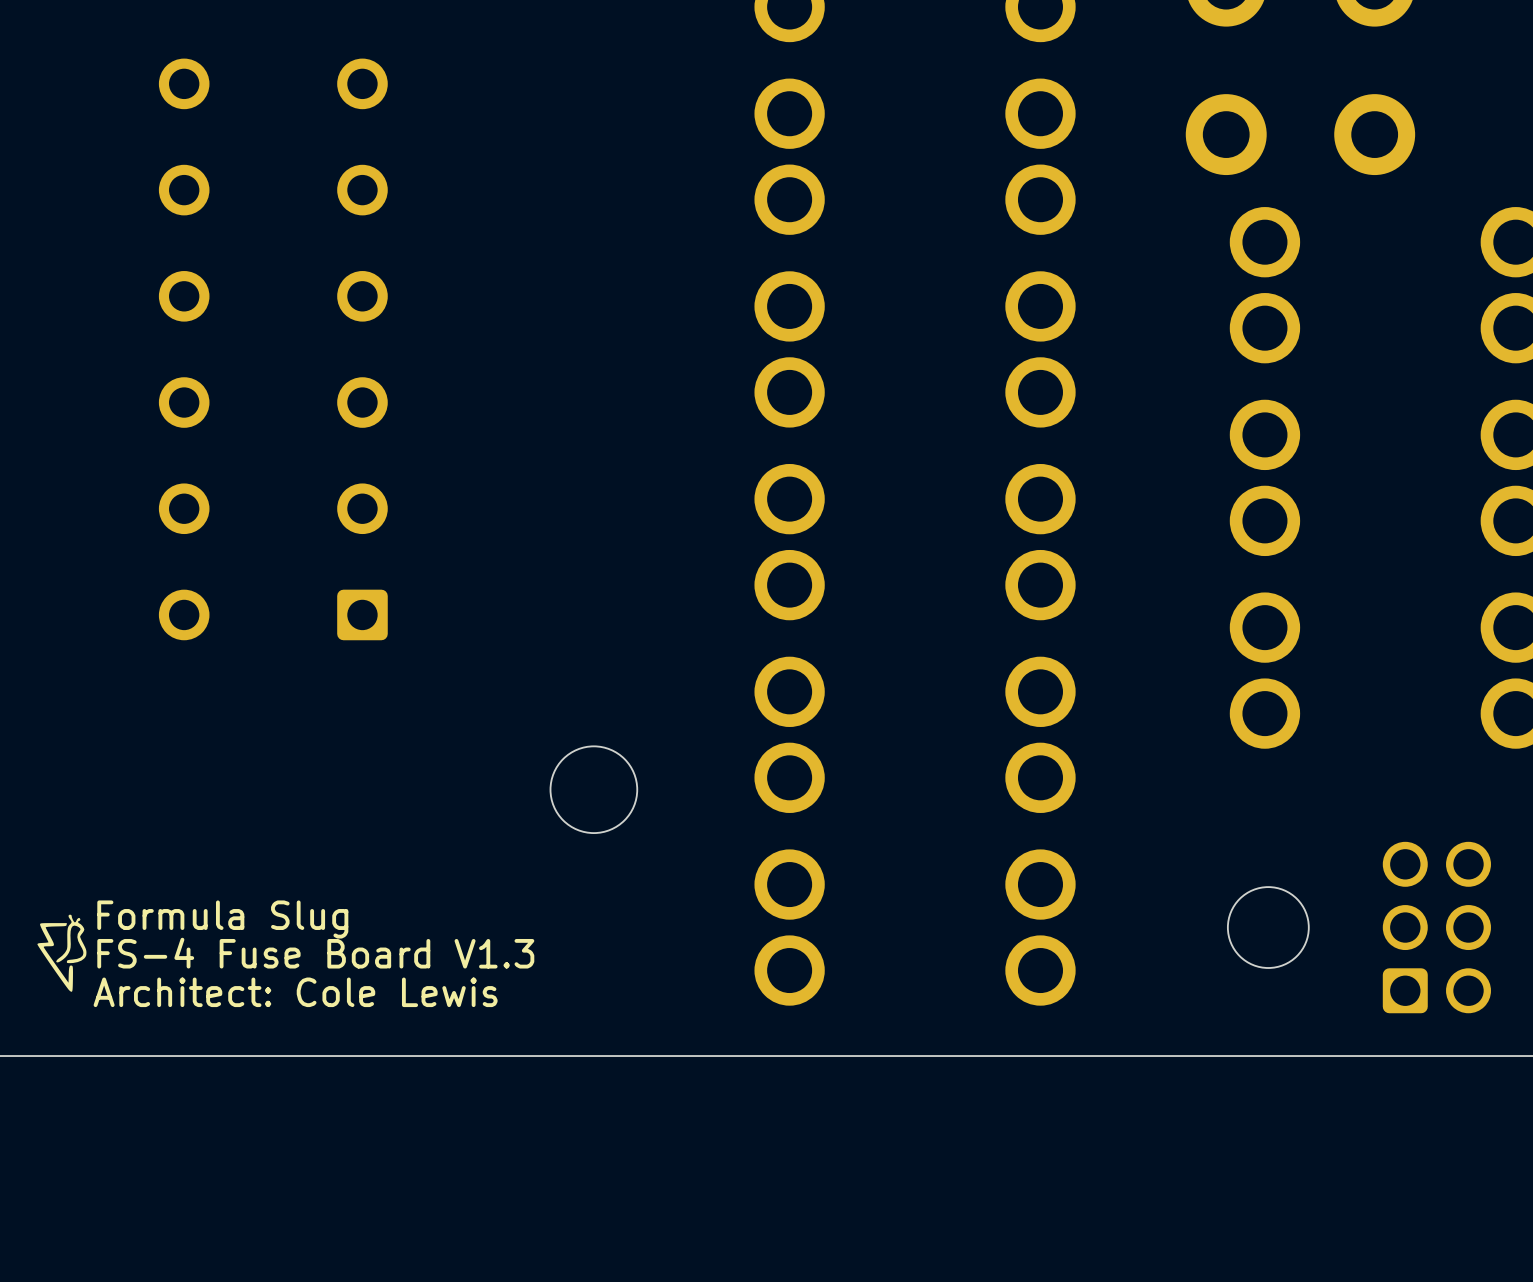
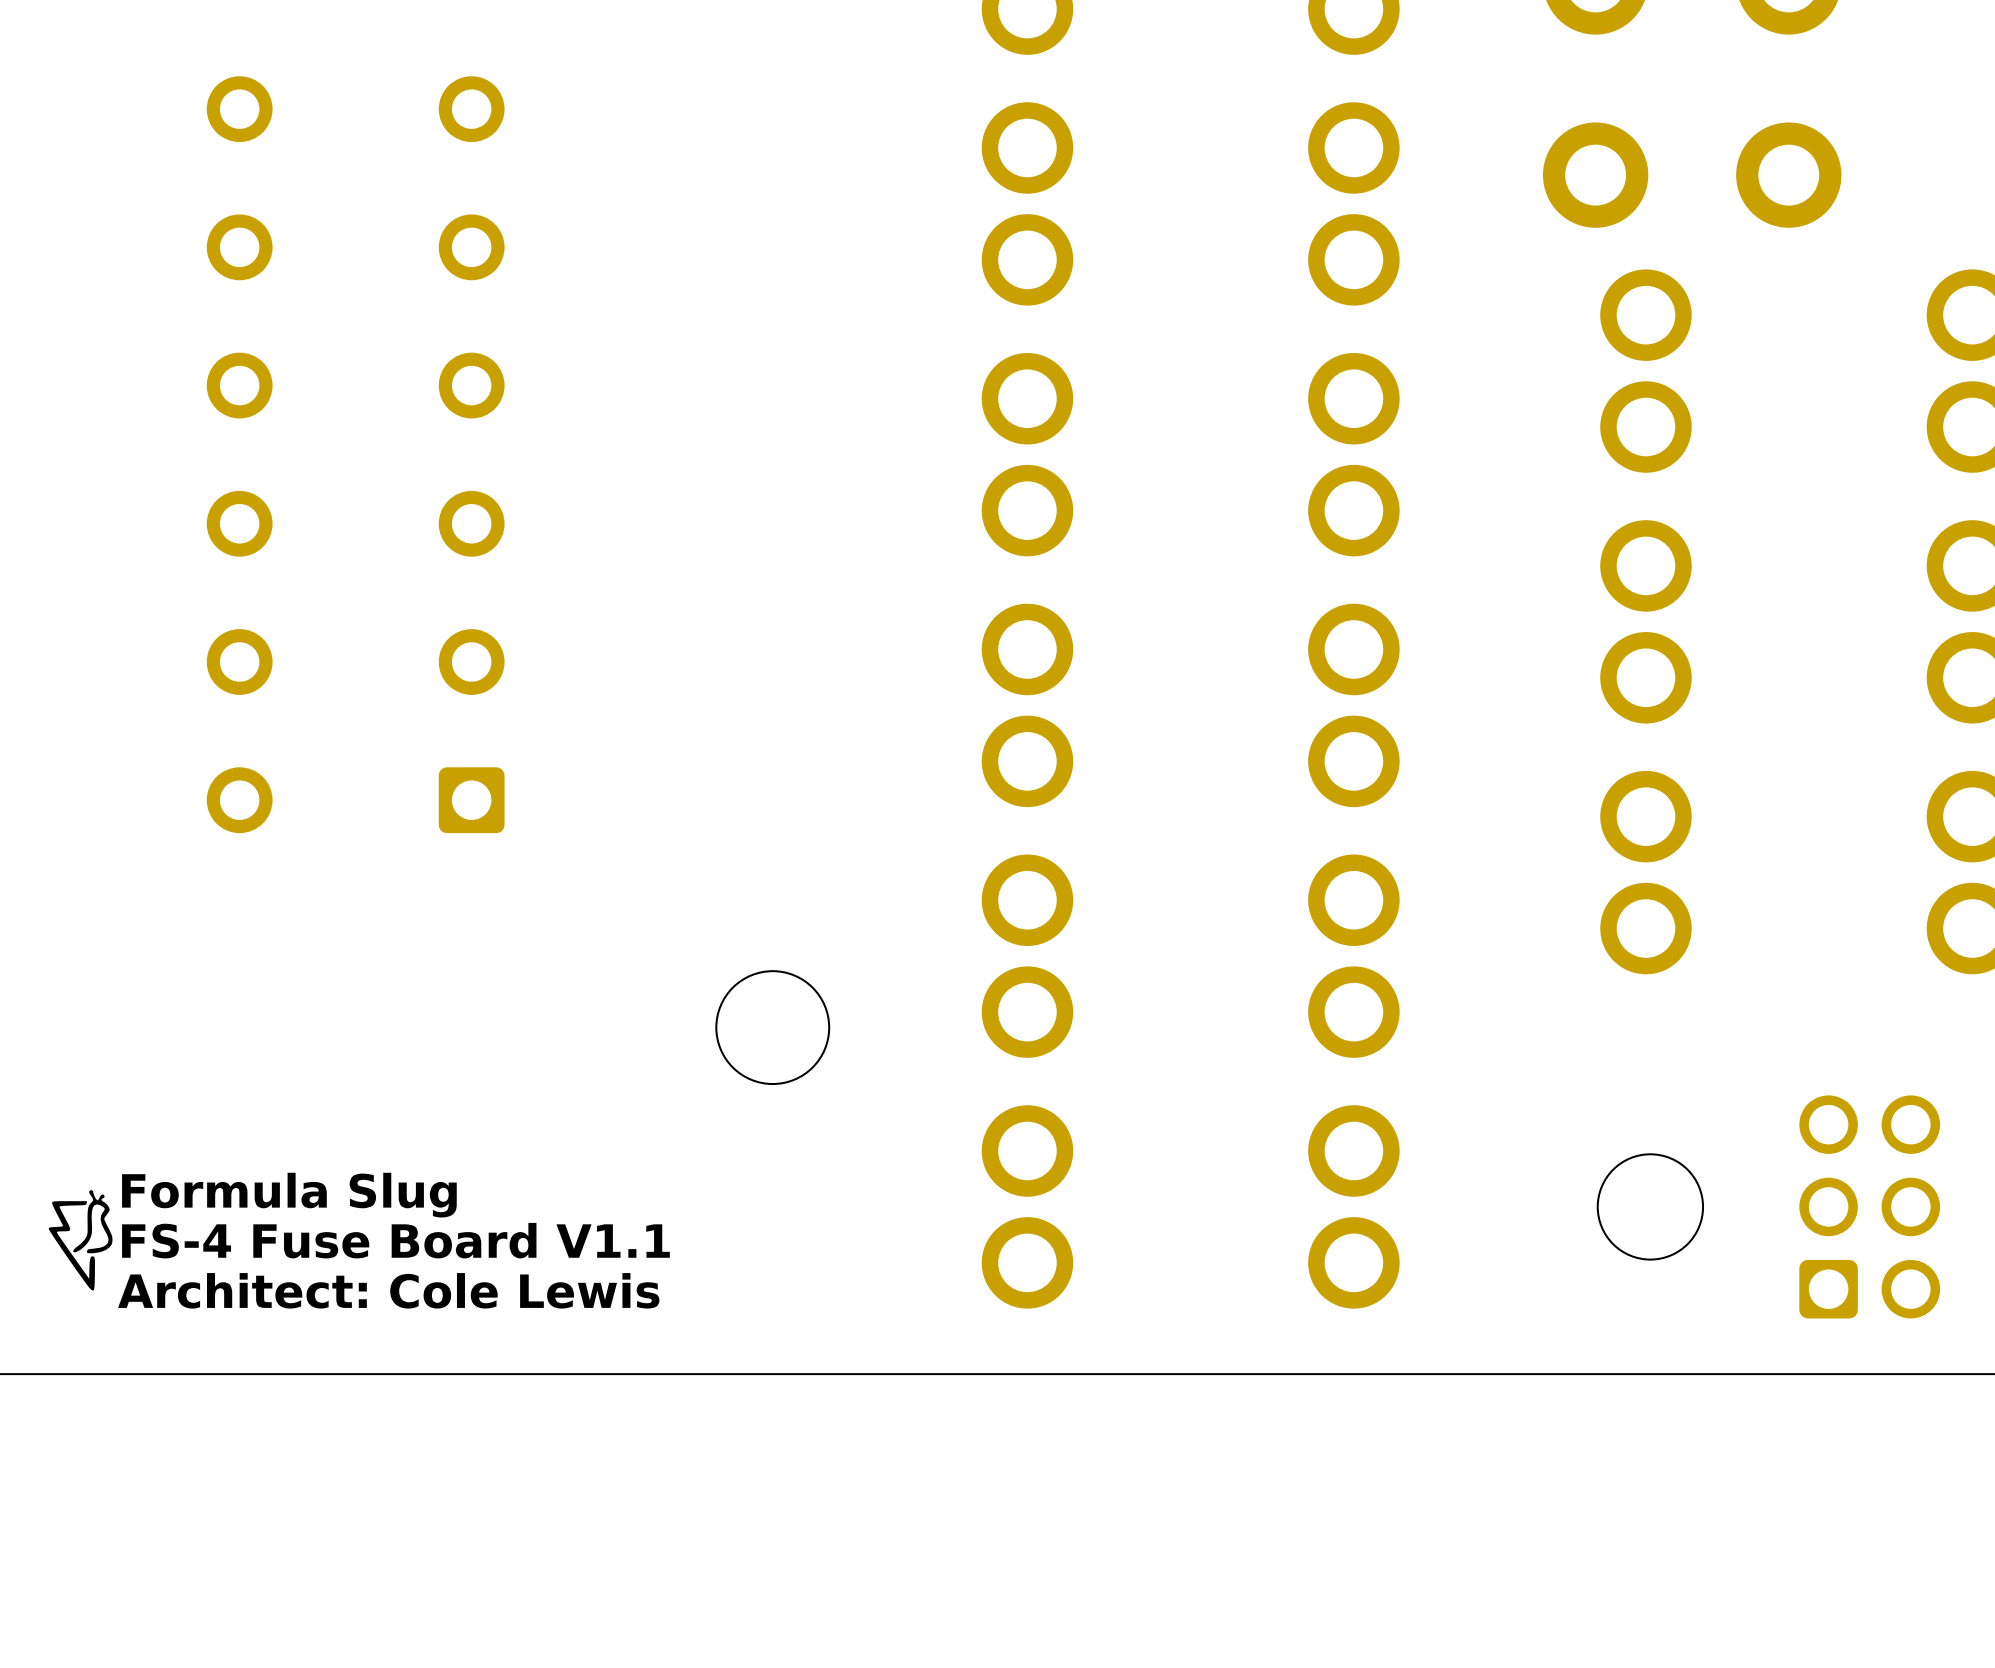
drawing shape: [37, 900, 535, 1008] -> [48, 1172, 670, 1309]

